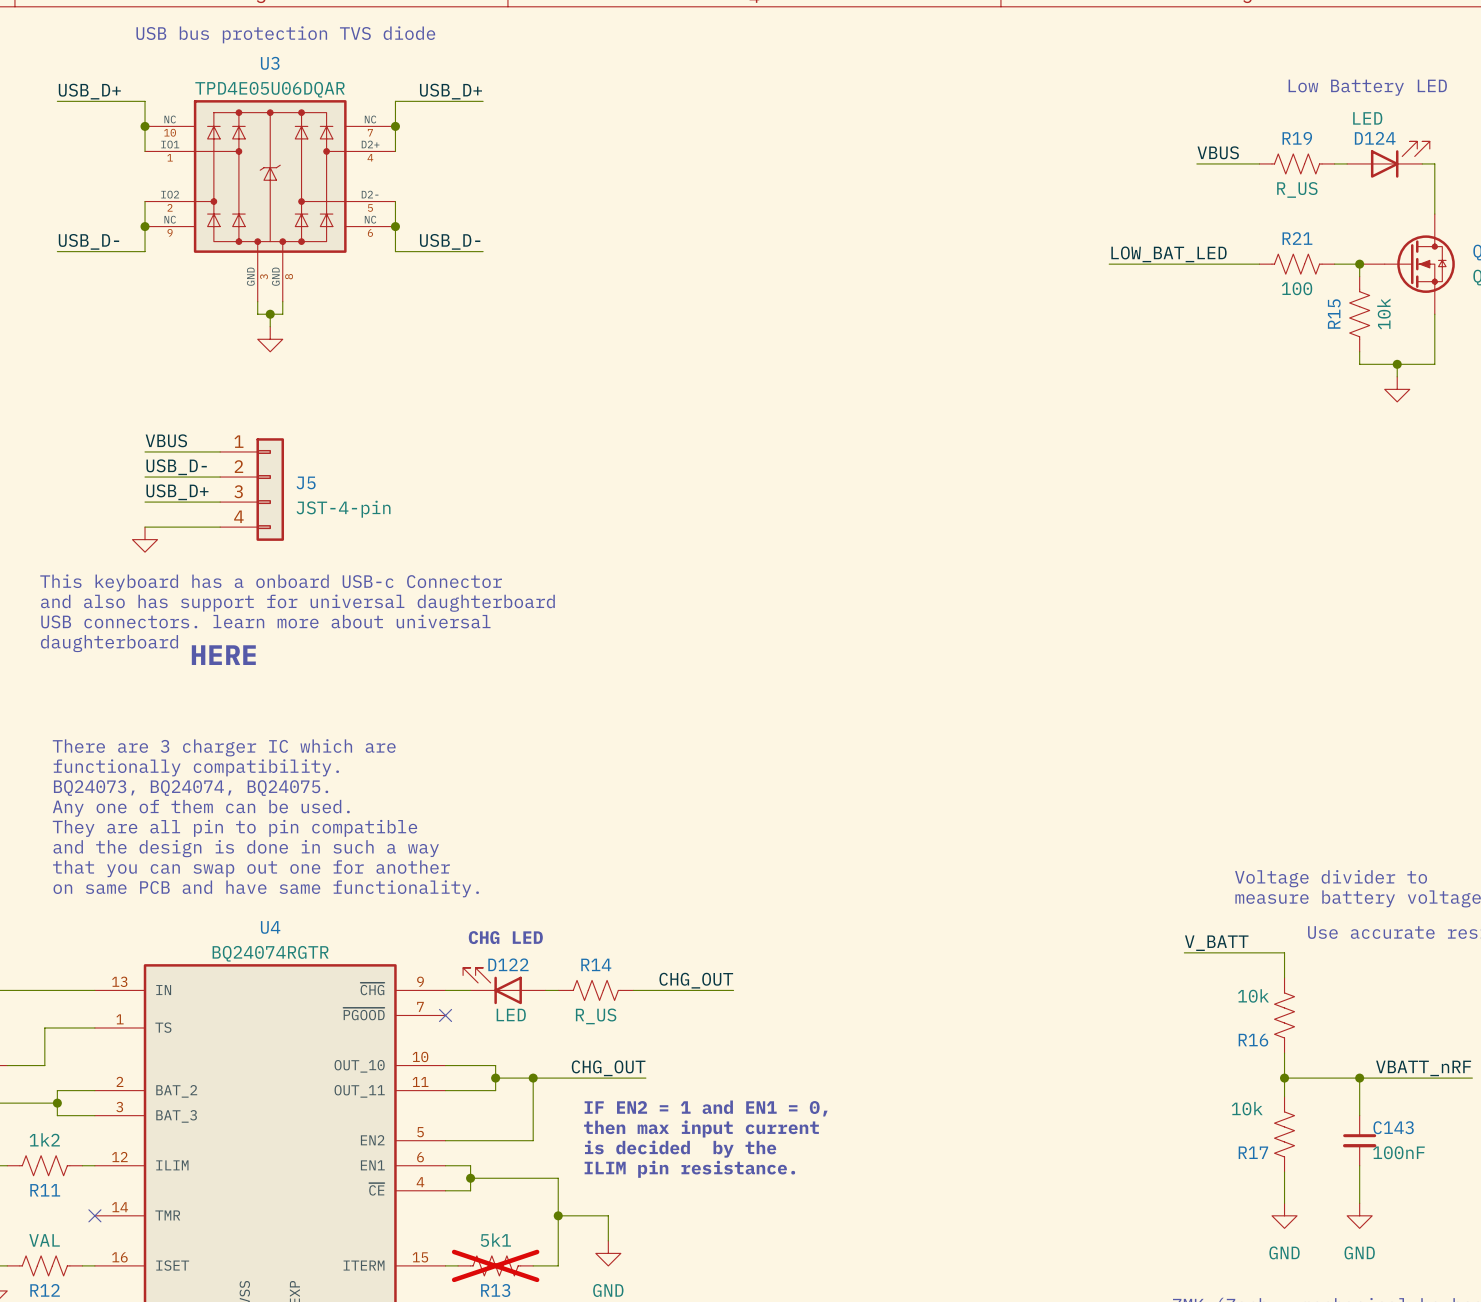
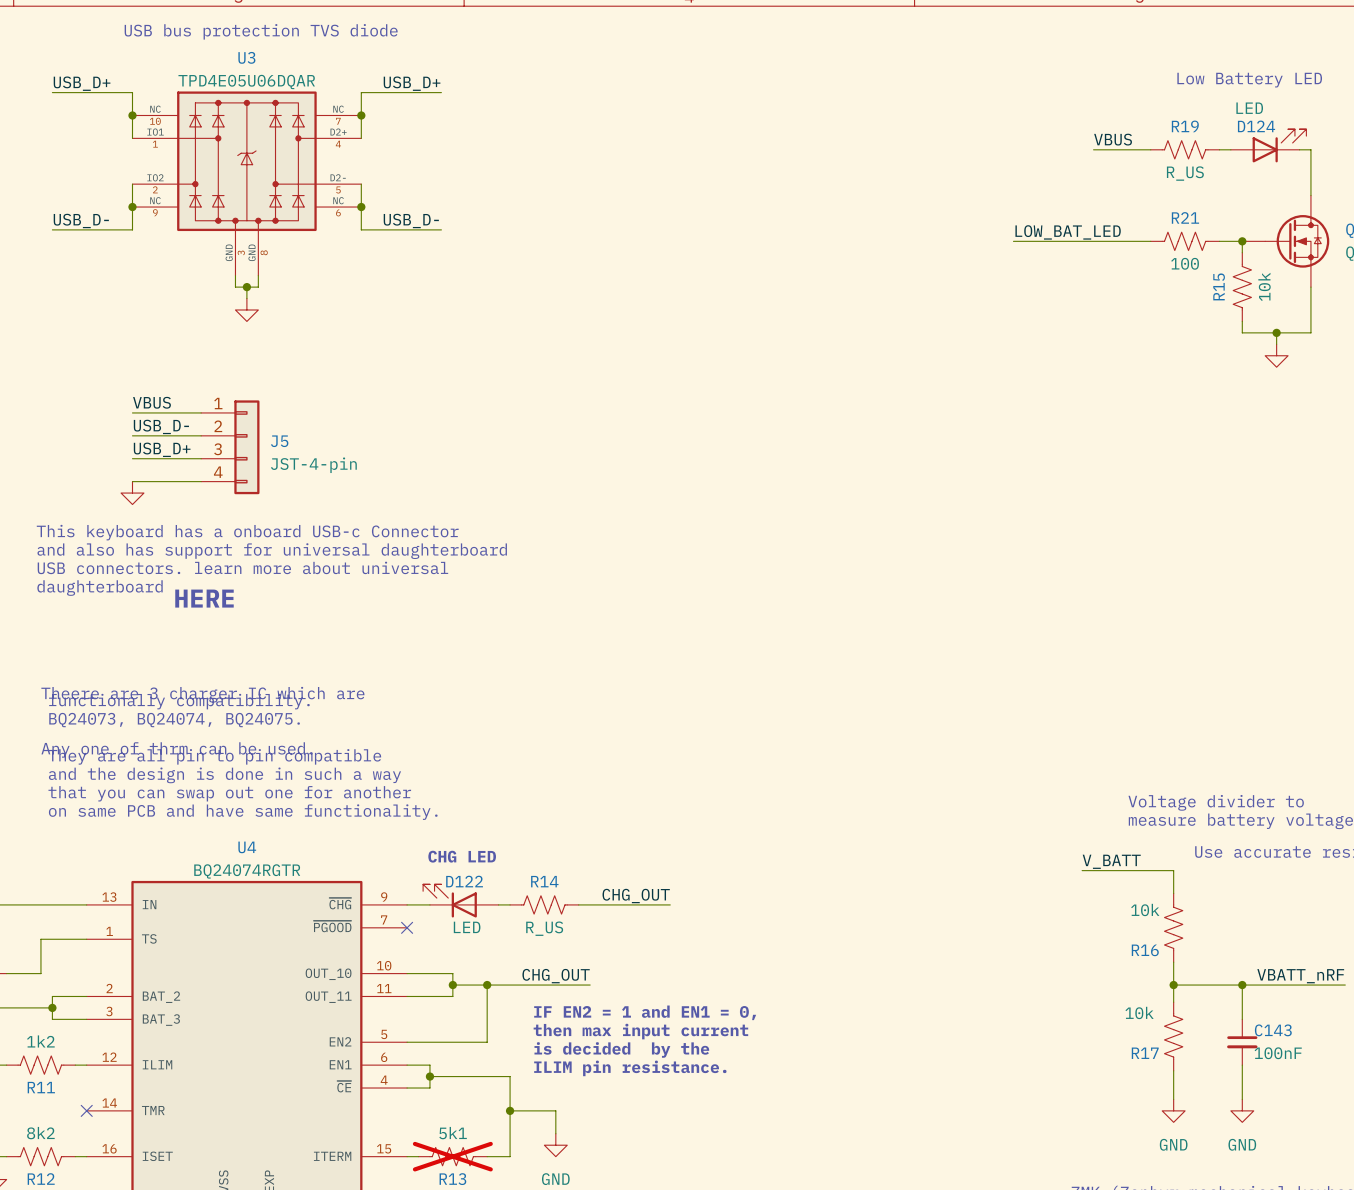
text: There are 3 charger IC which are (224, 747) -> Theere are 3 charger IC which are (202, 694)
text: Any one of them can be used. (201, 808) -> Any one of thrm can be used. (177, 749)
R12 value: VAL (44, 1240) -> 8k2 (40, 1133)

